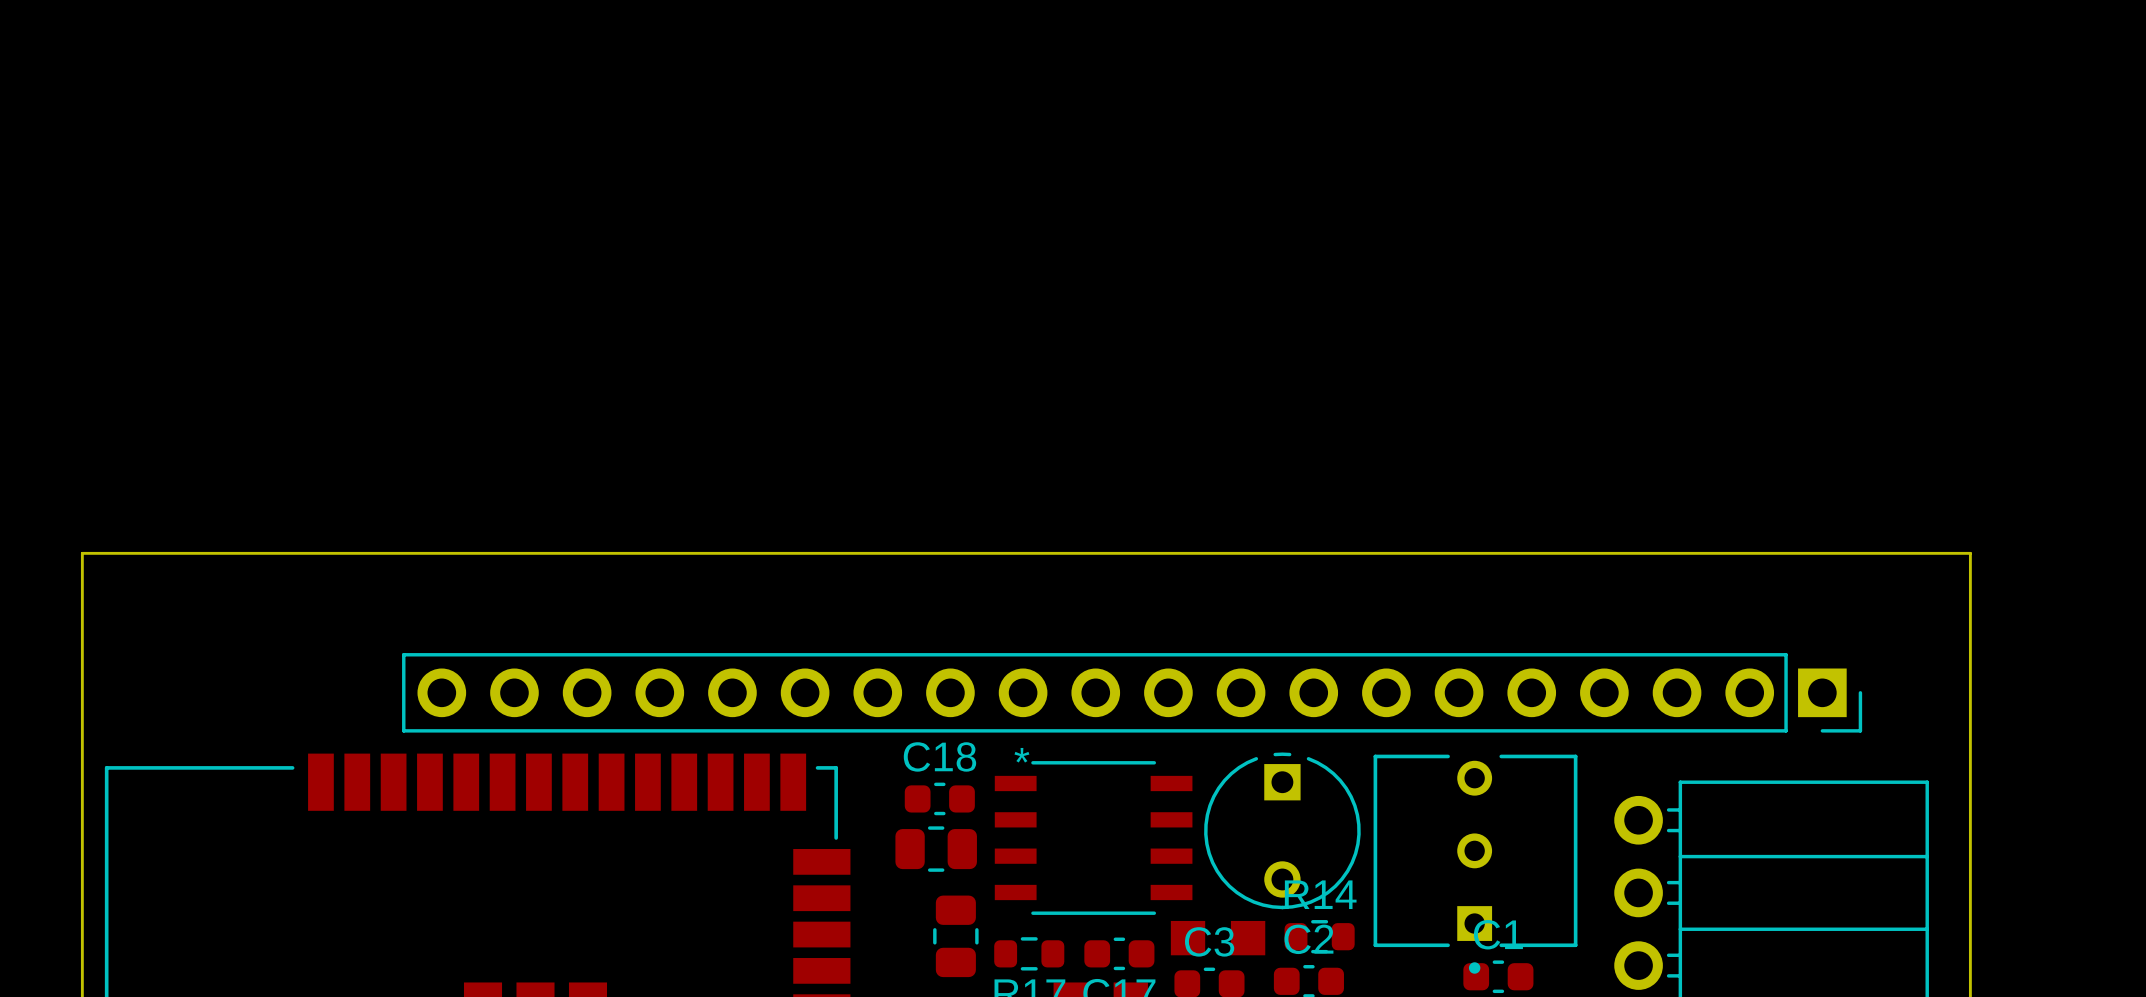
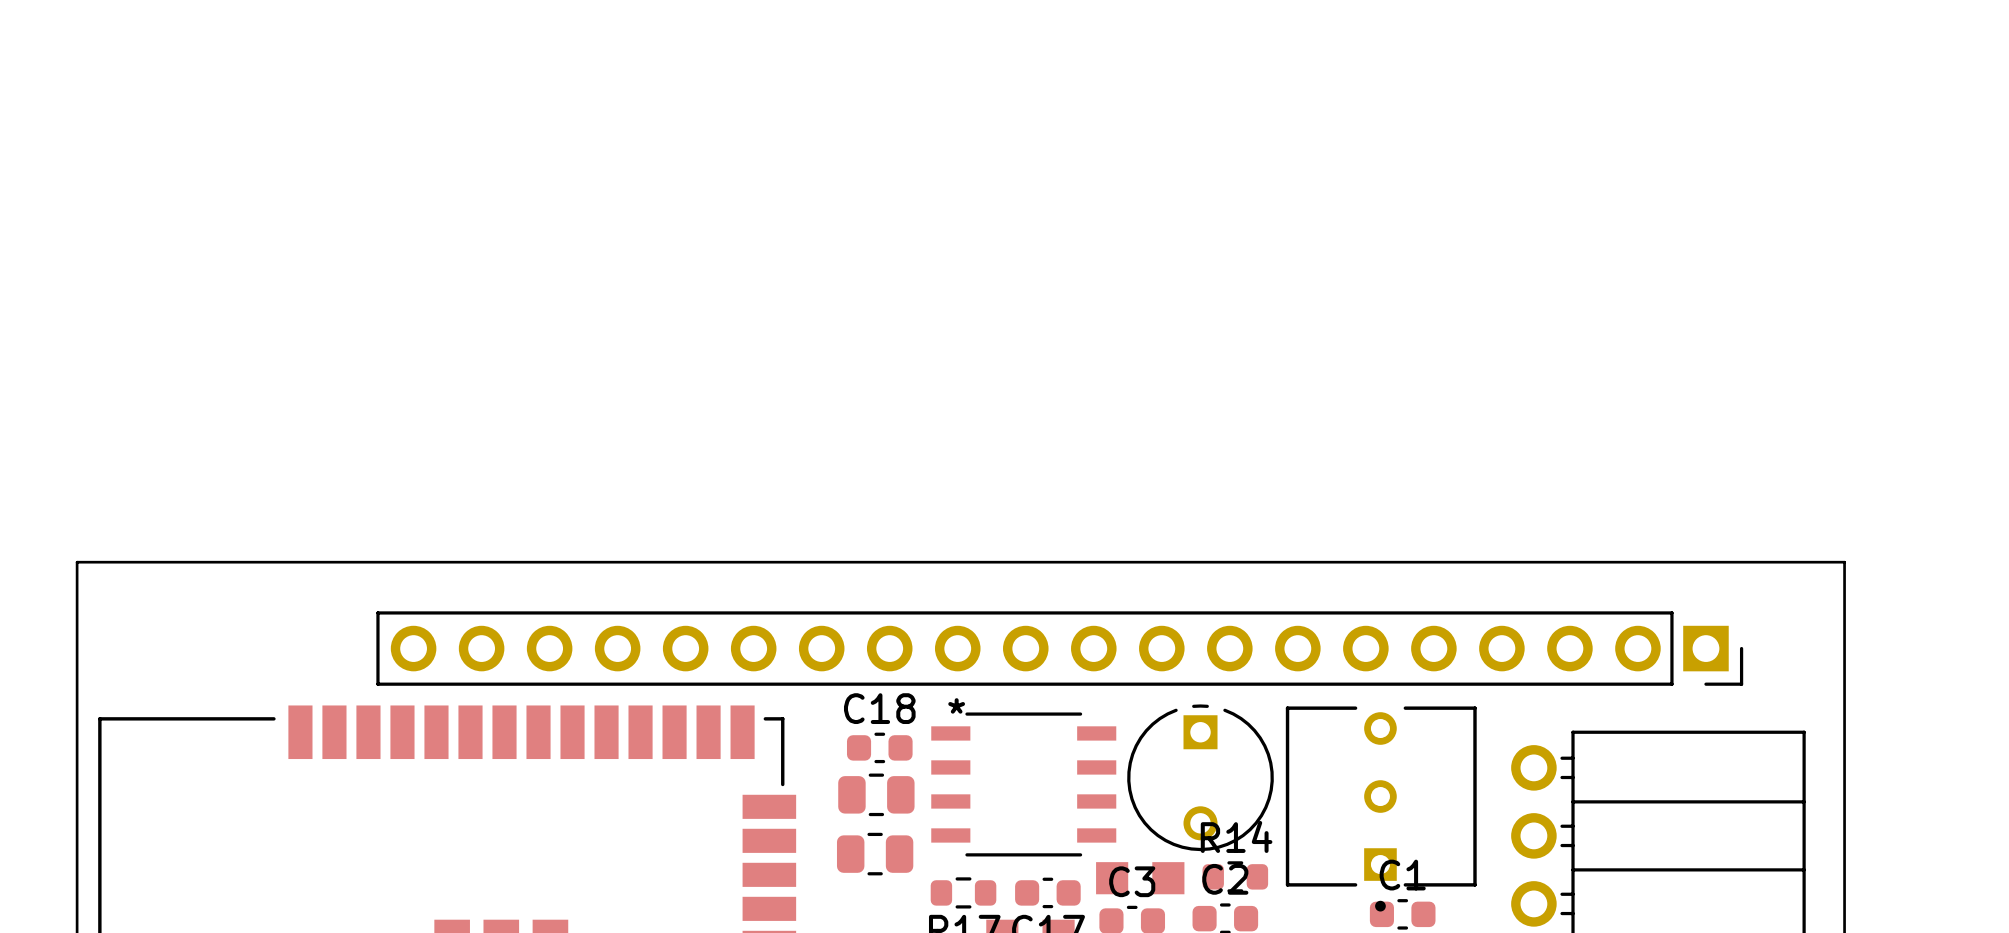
board edge: (82, 600) (82, 553) (1970, 553) (1970, 600) -> (77, 562) (1844, 562)
part rotation: 0° (955, 936) -> 90° clockwise (875, 854)

